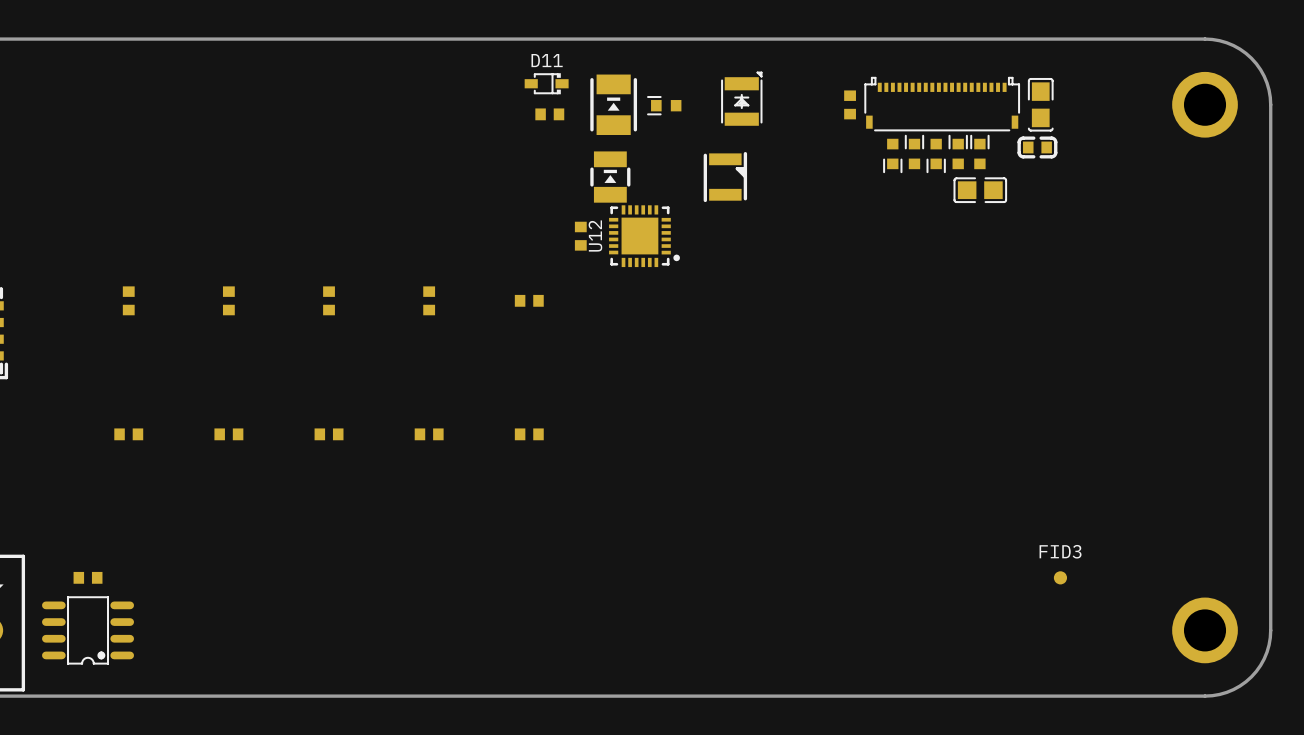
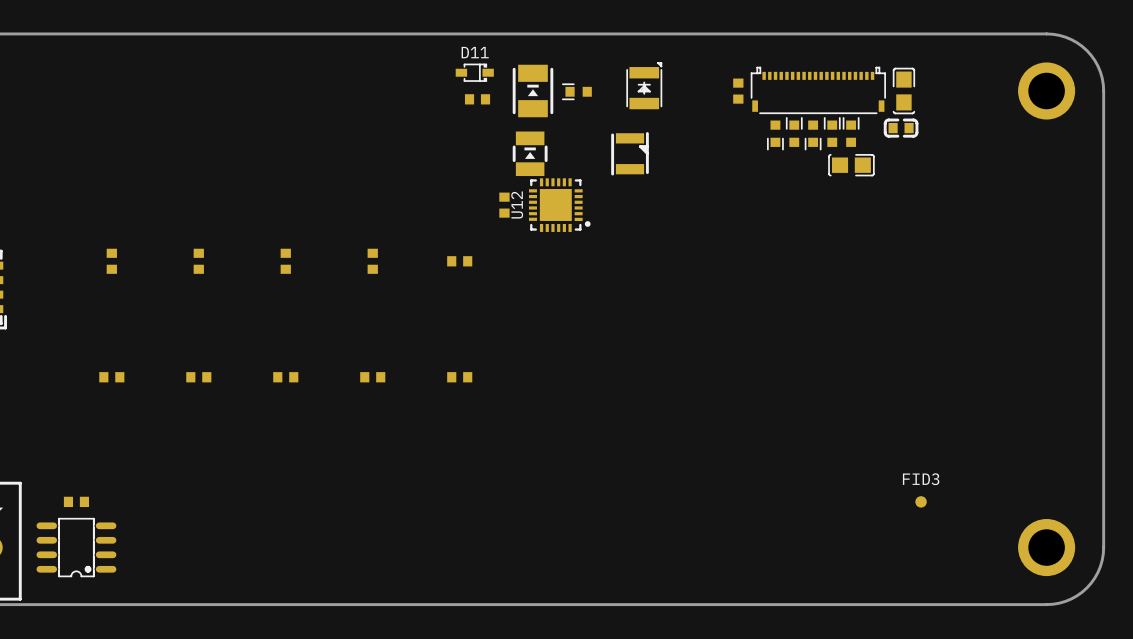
part footprint: [953, 177, 1008, 204] -> [828, 154, 875, 177]

